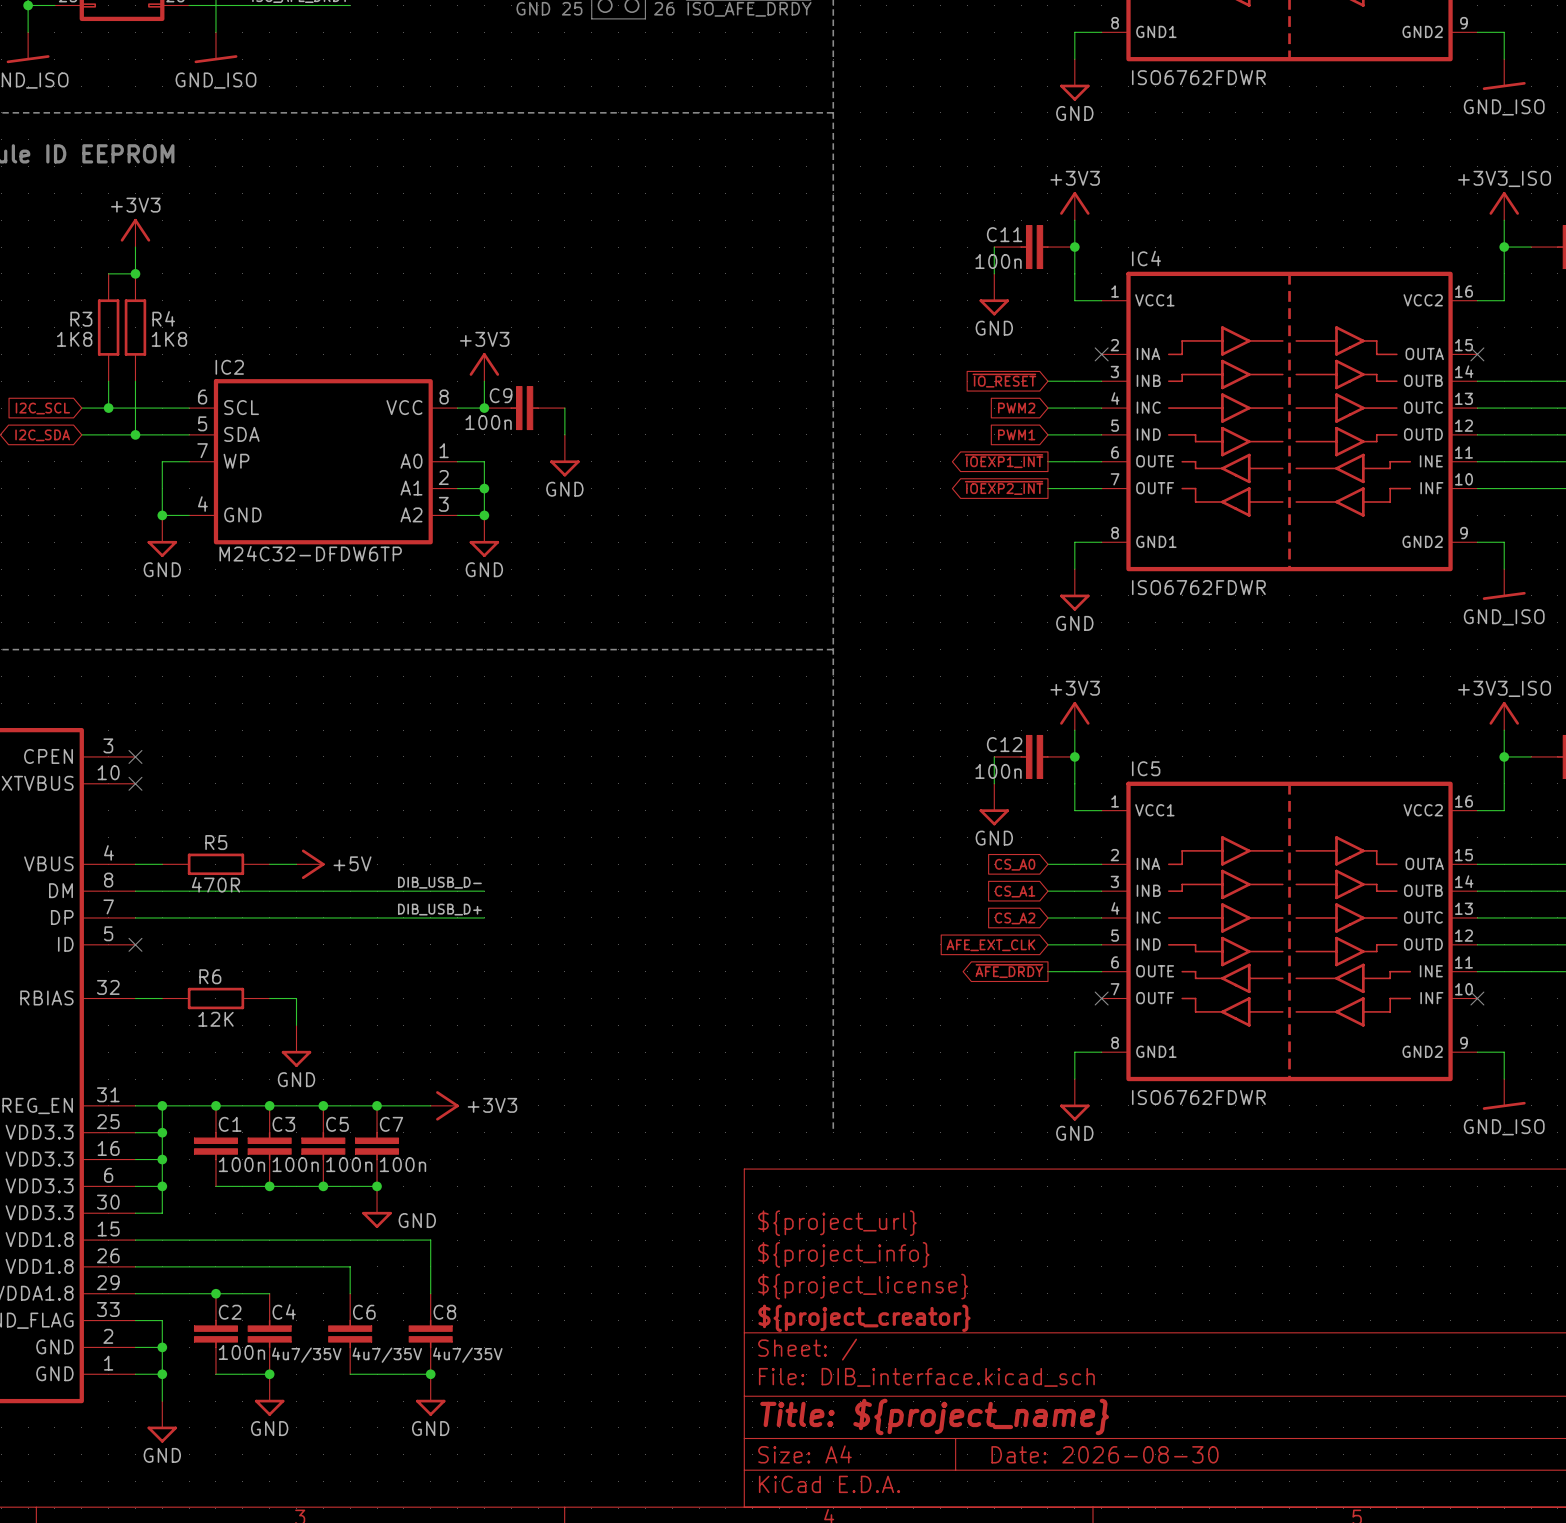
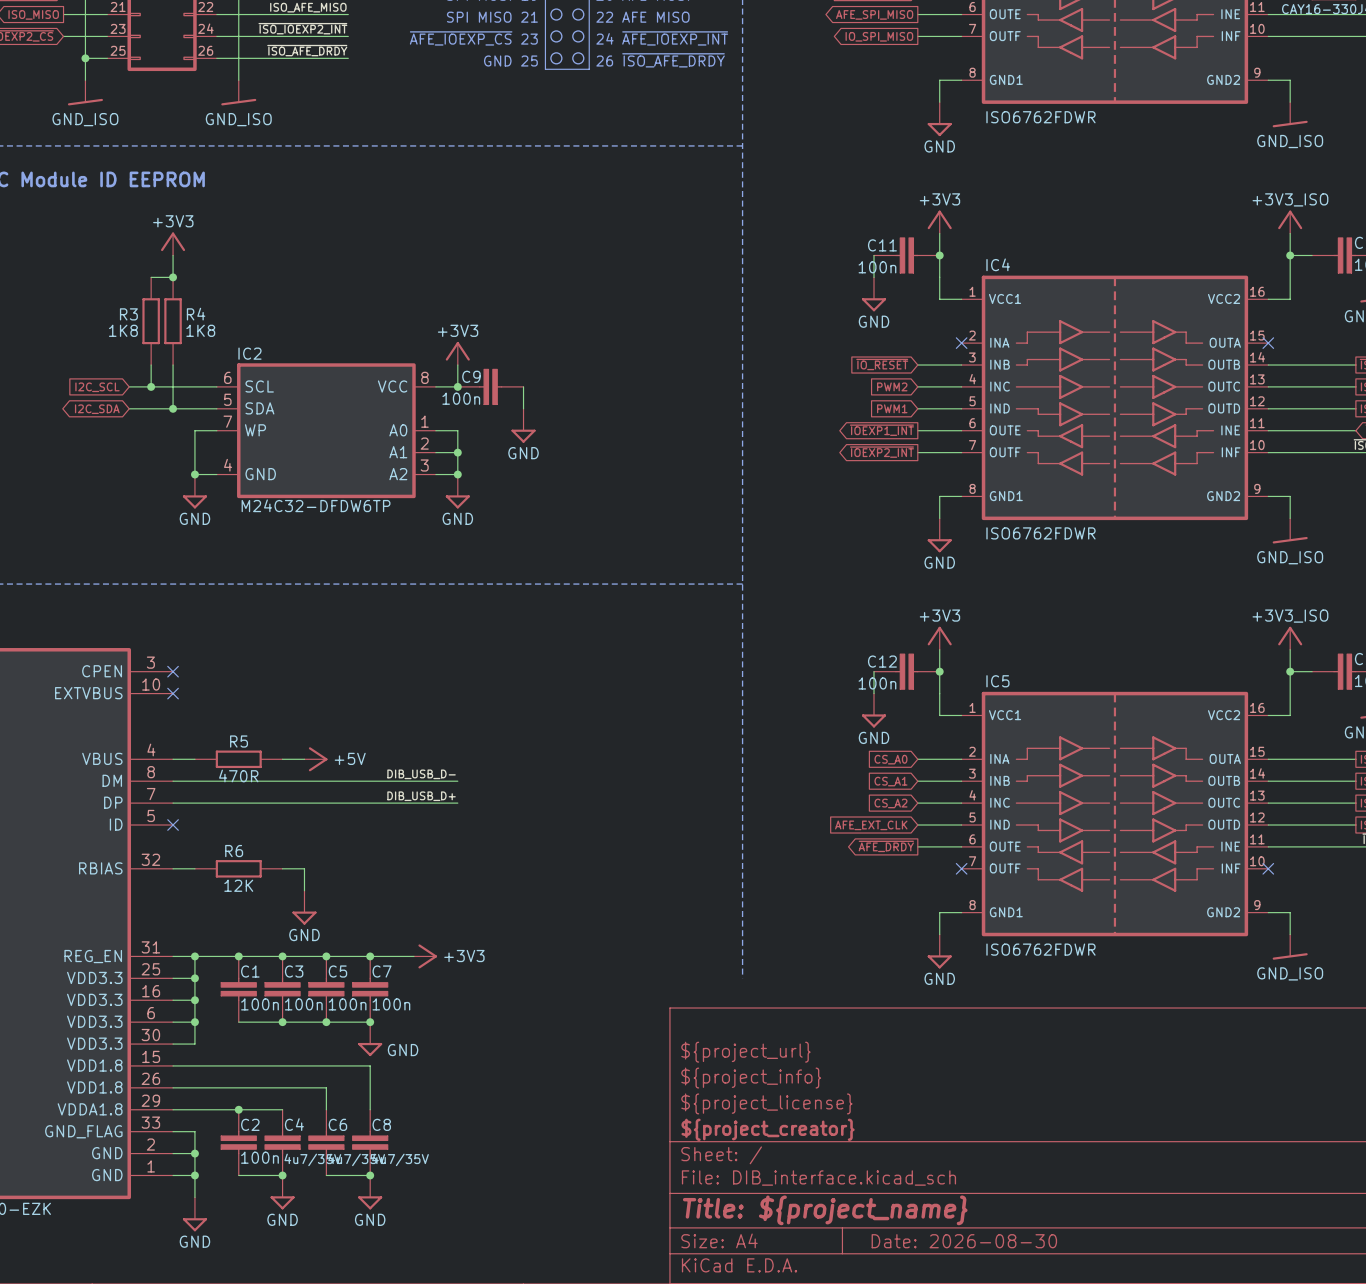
wire: (377, 1240) (430, 1240) (430, 1293) -> (370, 1065) (370, 1109)
wire: (323, 1266) (350, 1266) (350, 1293) -> (326, 1087) (326, 1109)
C6 position: (350, 1333) -> (326, 1142)
C8 position: (430, 1333) -> (370, 1142)
wire: none -> (326, 1175) (348, 1175)
wire: (377, 1374) (430, 1374) -> none
junction position: (430, 1374) -> (370, 1175)
power symbol position: GND (430, 1395) -> GND (370, 1192)

